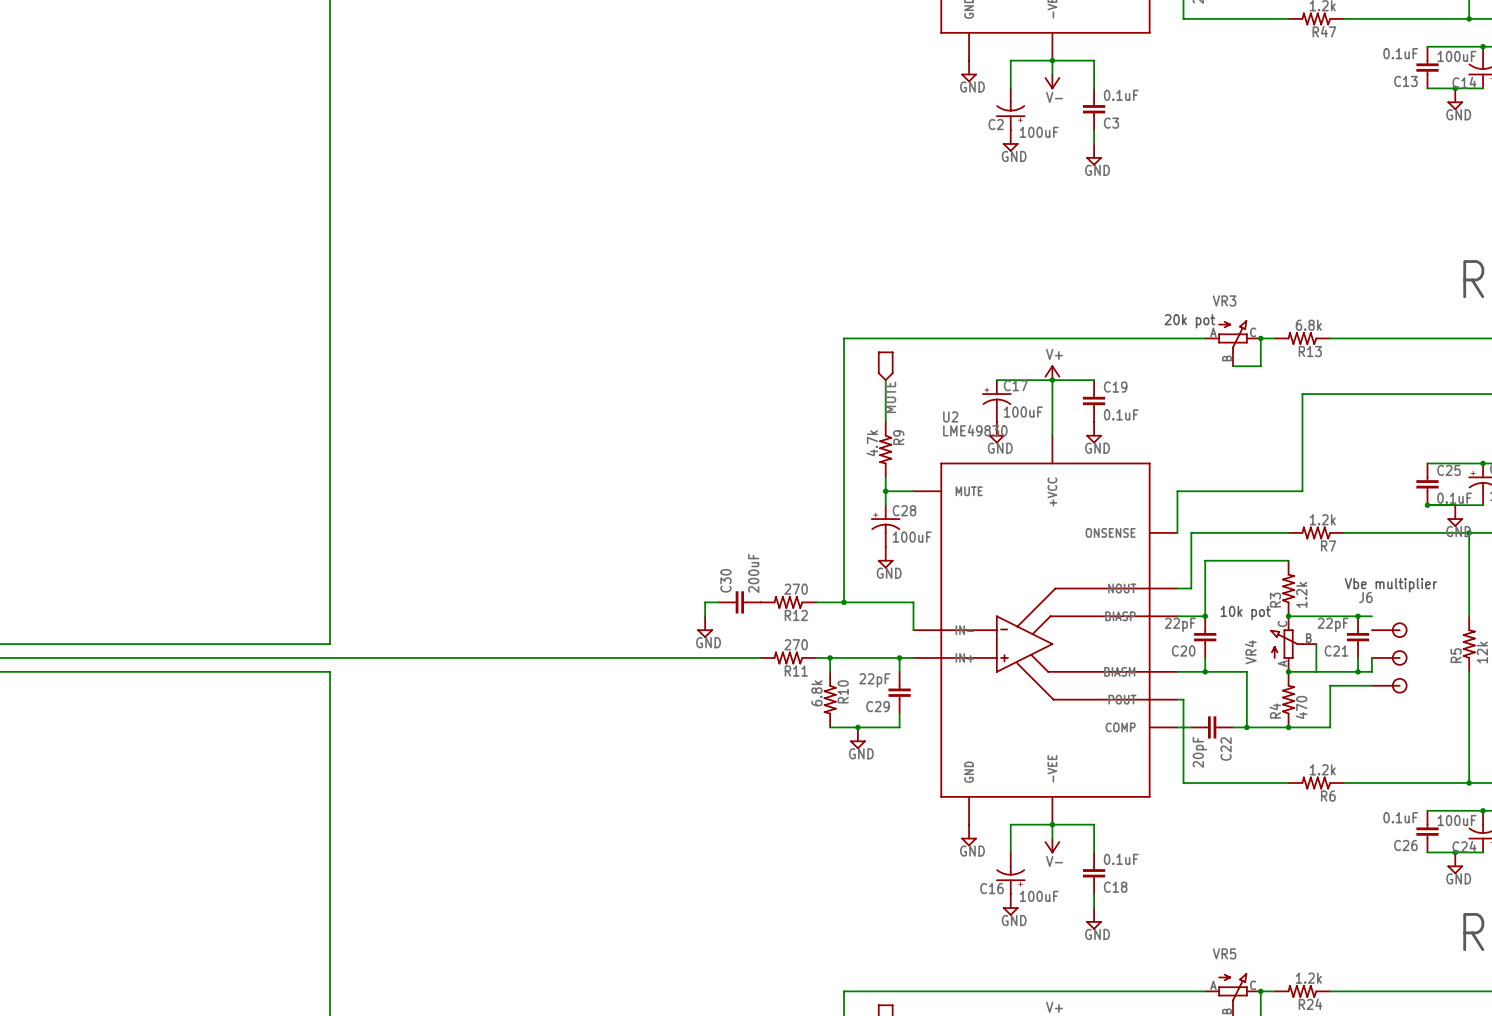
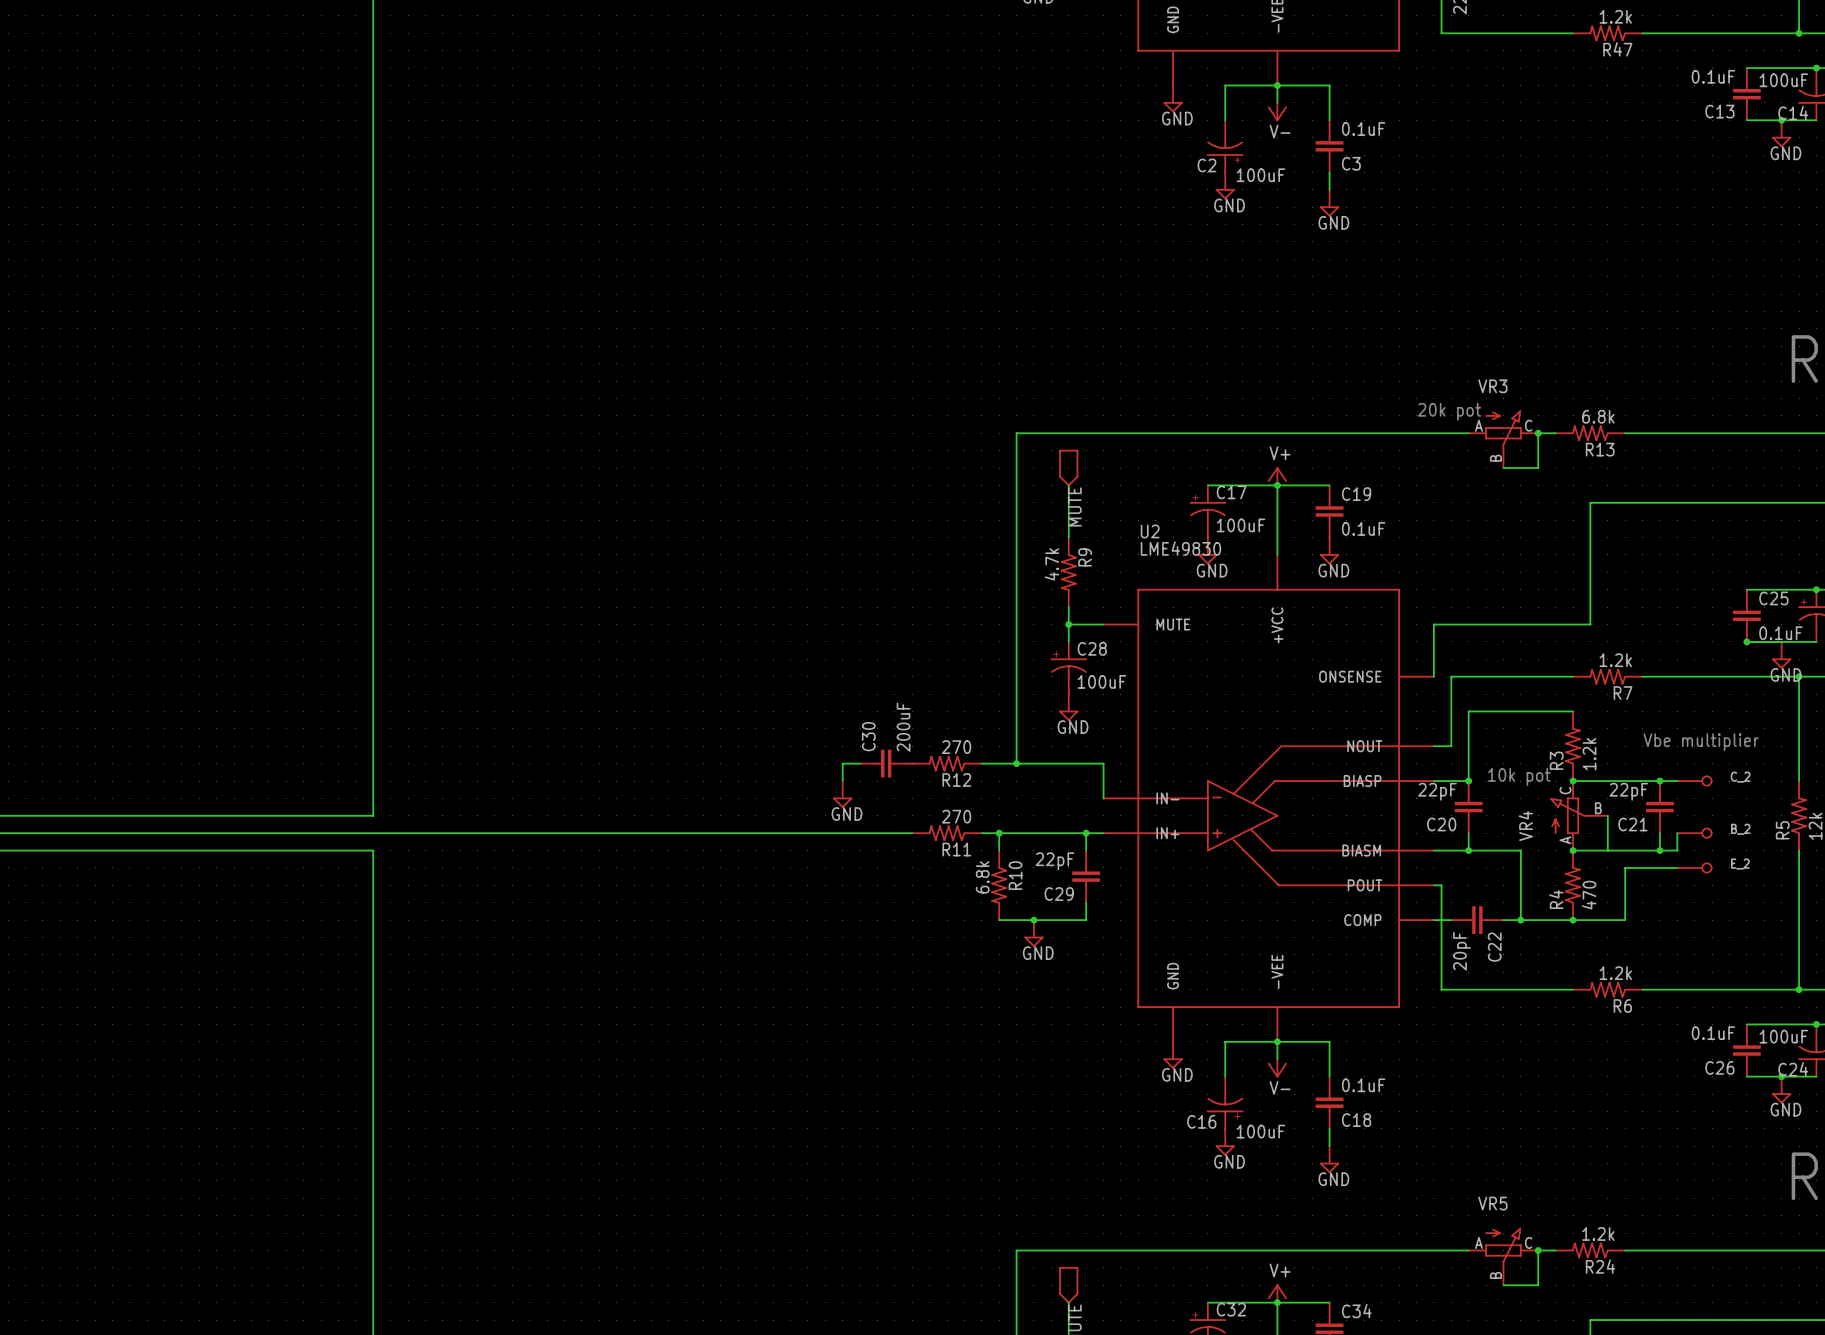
C_2: none -> (1694, 781)
B_2: none -> (1694, 833)
J6: (1389, 657) -> none
E_2: none -> (1694, 867)

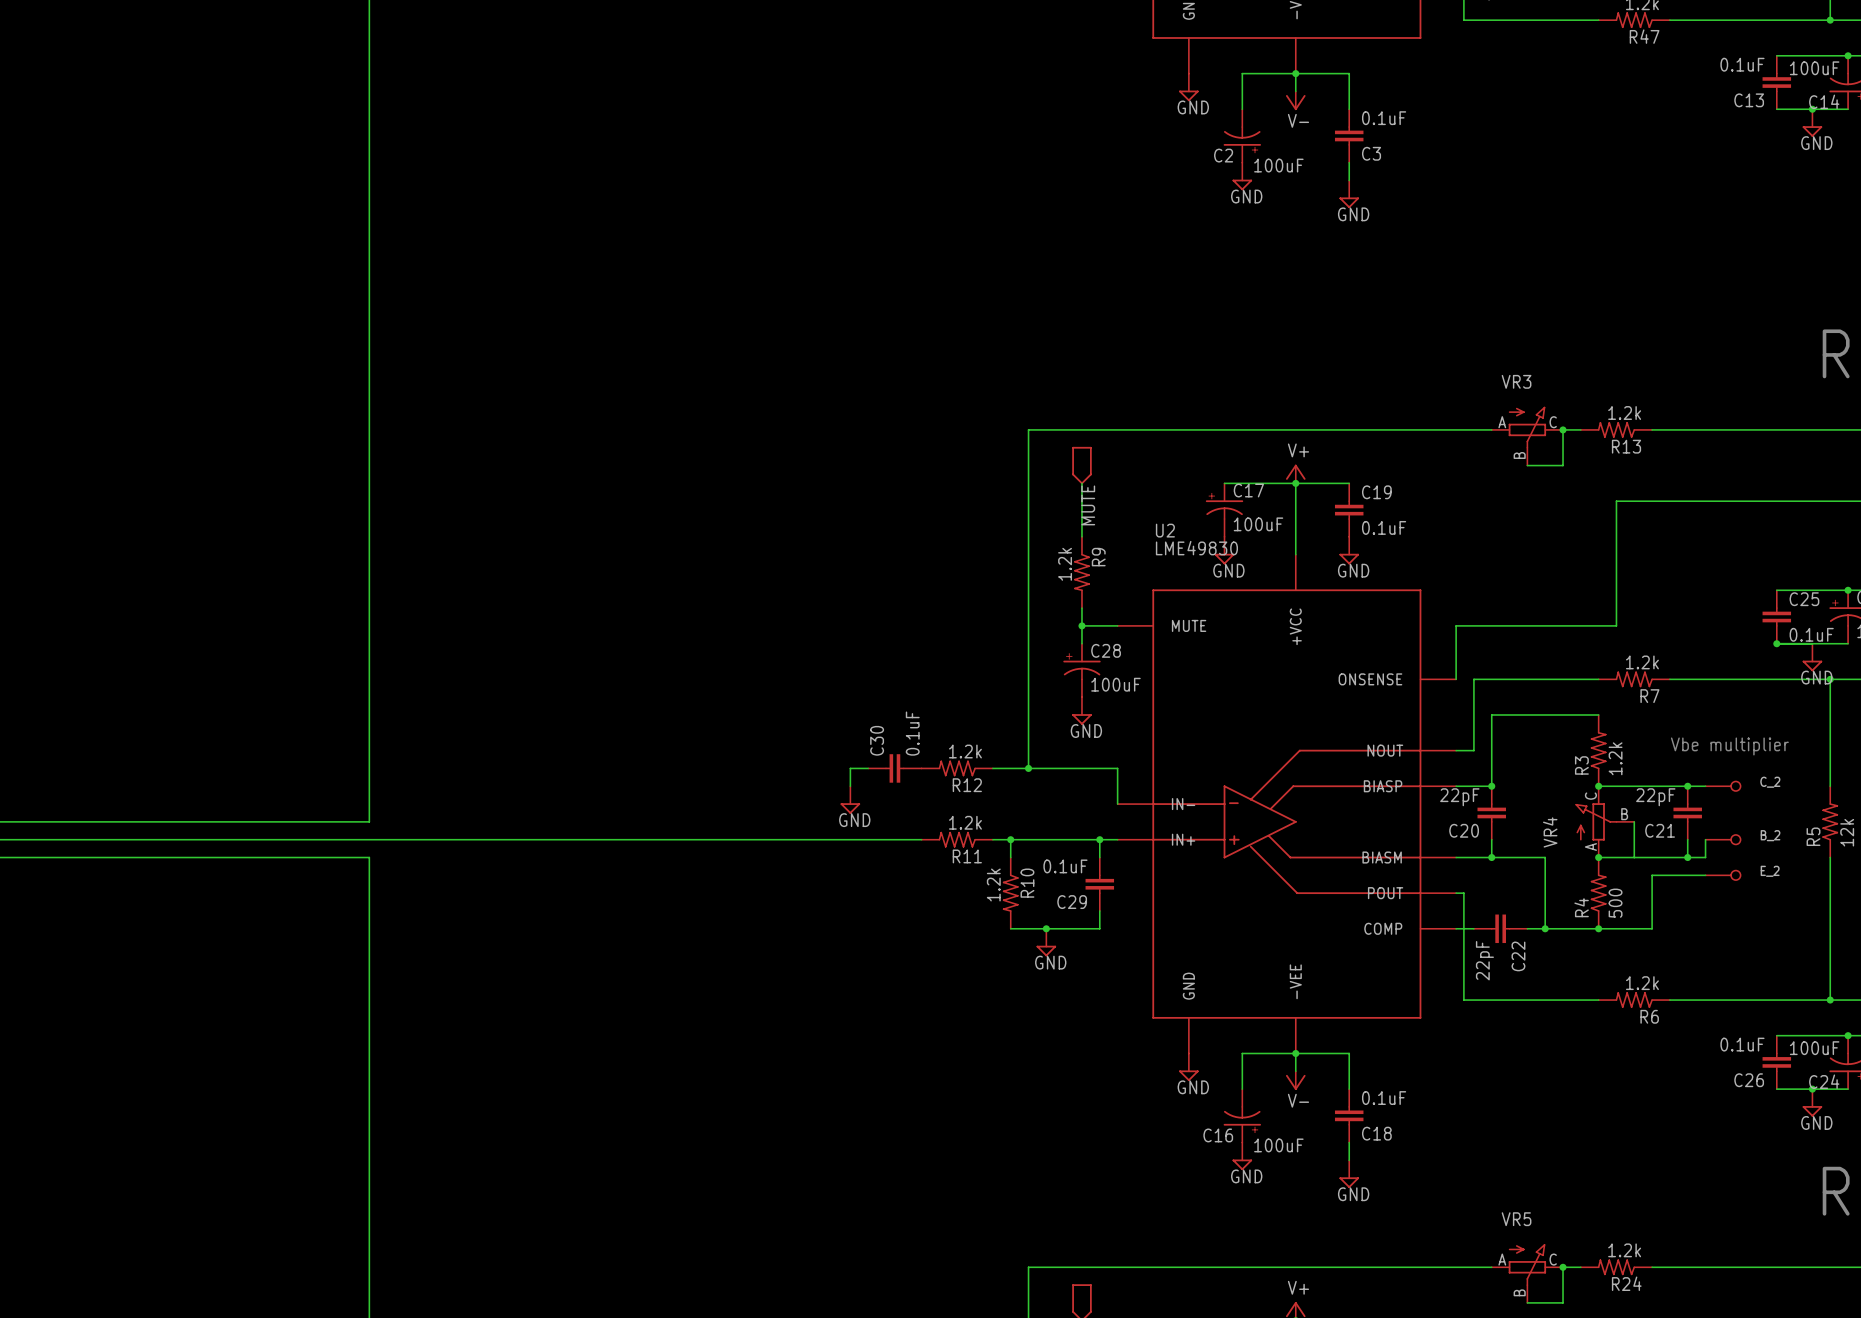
text: 20k pot (1449, 411) -> none
R13 value: 6.8k (1598, 416) -> 1.2k (1624, 413)
R9 value: 4.7k (1051, 564) -> 1.2k (1065, 564)
C30 value: 200uF (903, 727) -> 0.1uF (912, 733)
R12 value: 270 (956, 747) -> 1.2k (965, 751)
text: 10k pot (1519, 776) -> none
R11 value: 270 (956, 816) -> 1.2k (965, 822)
C29 value: 22pF (1054, 861) -> 0.1uF (1065, 866)
R10 value: 6.8k (982, 877) -> 1.2k (993, 884)
R4 value: 470 (1589, 895) -> 500 (1615, 903)
C22 value: 20pF (1462, 951) -> 22pF (1484, 960)

